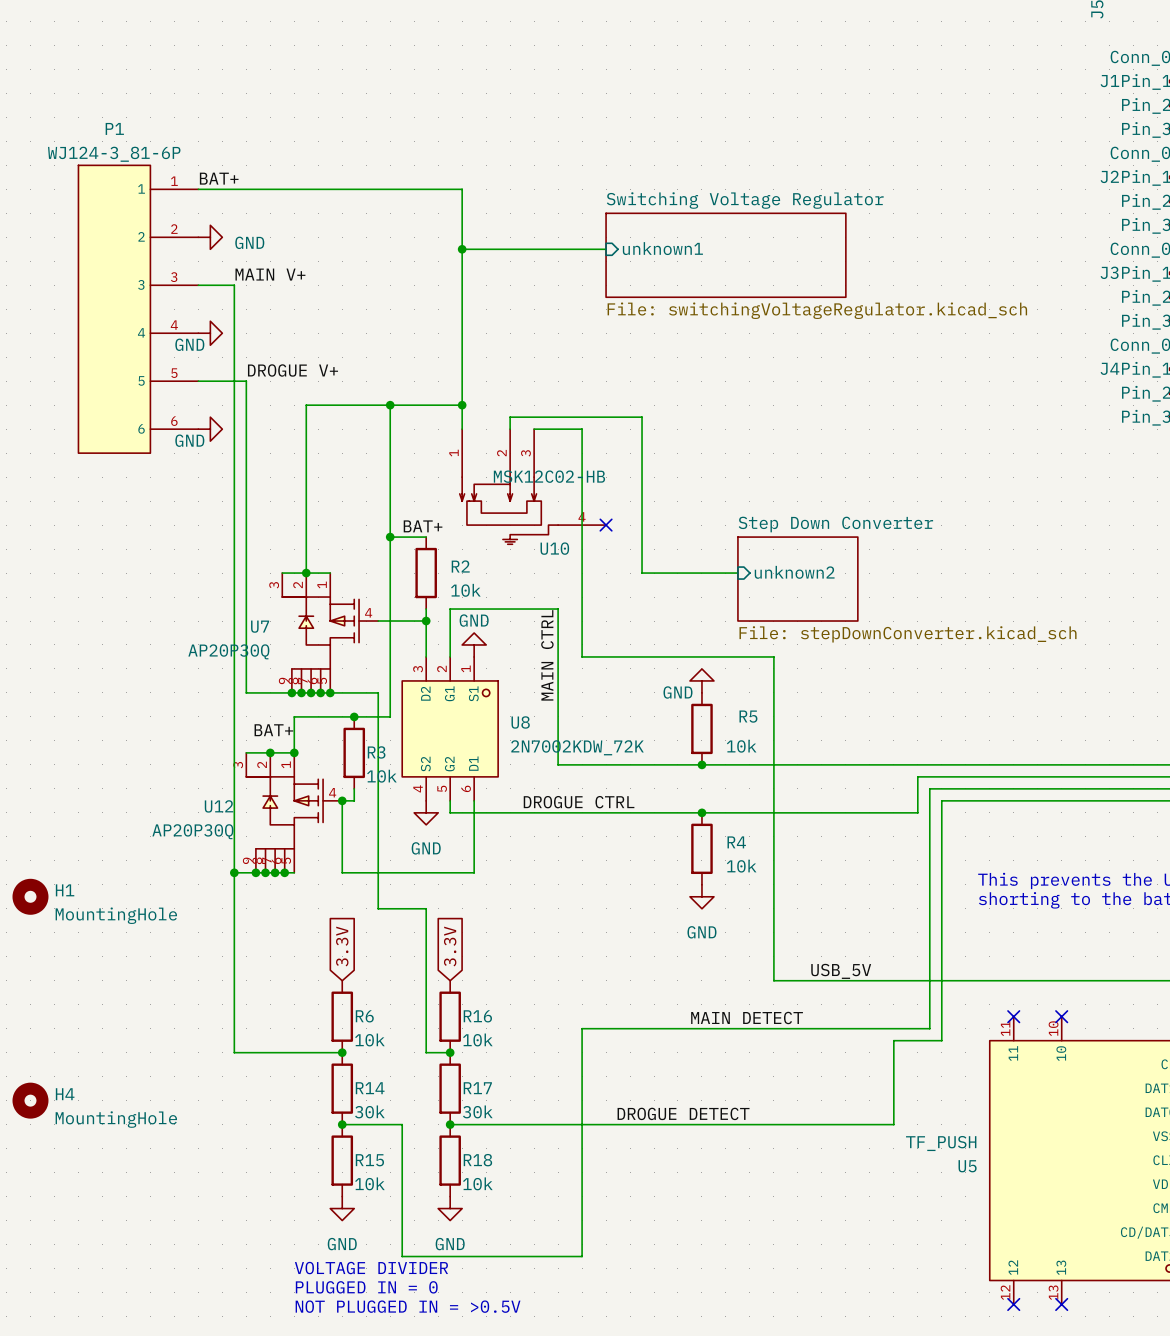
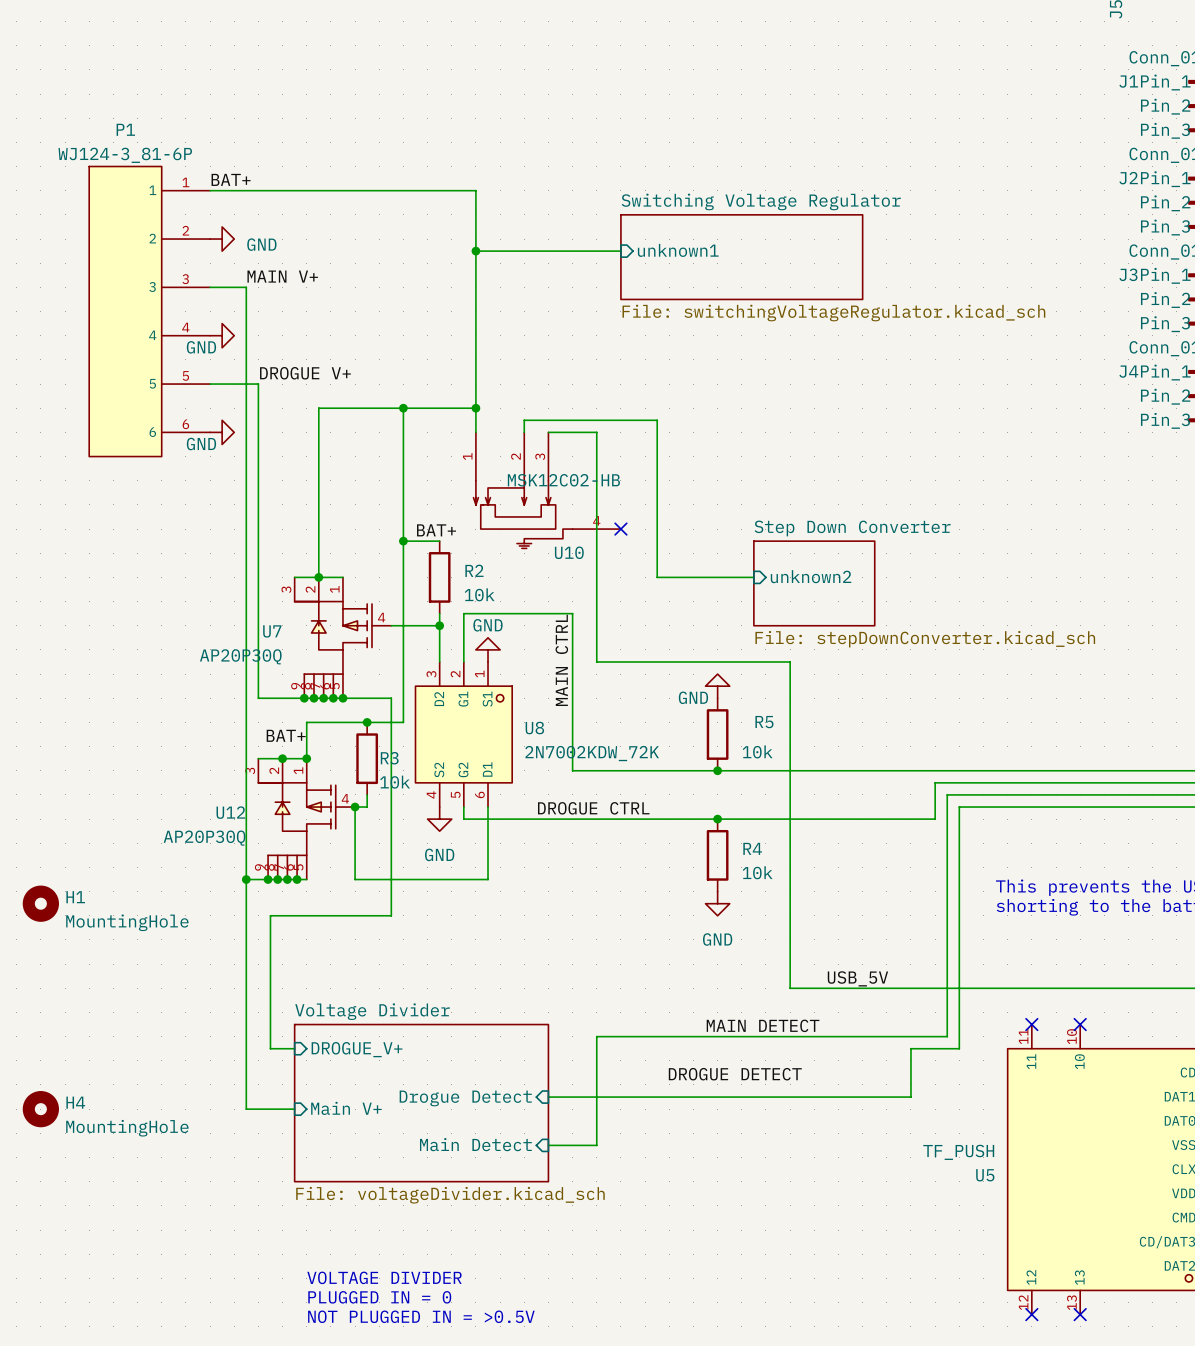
wire: (378, 908) (426, 908) (426, 1052) (450, 1052) -> (391, 915) (270, 915) (270, 1048) (294, 1048)
global label: 3.3V (342, 946) -> none
global label: 3.3V (450, 946) -> none
R6: 10k (342, 1016) -> none
R16: 10k (450, 1016) -> none
sheet pin: none -> DROGUE_V+ (357, 1049)
wire: (234, 1052) (342, 1052) -> (246, 1060) (246, 1109) (294, 1109)
junction: (342, 1052) -> none
junction: (450, 1052) -> none
R14: 30k (342, 1088) -> none
R17: 30k (450, 1088) -> none
wire: (893, 1088) (893, 1124) (450, 1124) -> (910, 1097) (548, 1097)
sheet pin: none -> Drogue Detect (465, 1098)
sheet Voltage Divider: none -> File: voltageDivider.kicad_sch (421, 1103)
sheet pin: none -> Main V+ (346, 1108)
label position: DROGUE DETECT (683, 1113) -> DROGUE DETECT (735, 1074)
wire: (342, 1124) (402, 1124) (402, 1256) (582, 1256) (582, 1136) -> (548, 1145) (596, 1145)
junction: (342, 1124) -> none
junction: (450, 1124) -> none
sheet pin: none -> Main Detect (475, 1144)
R15: 10k (342, 1160) -> none
R18: 10k (450, 1160) -> none
power symbol: GND (342, 1208) -> none
power symbol: GND (450, 1208) -> none

